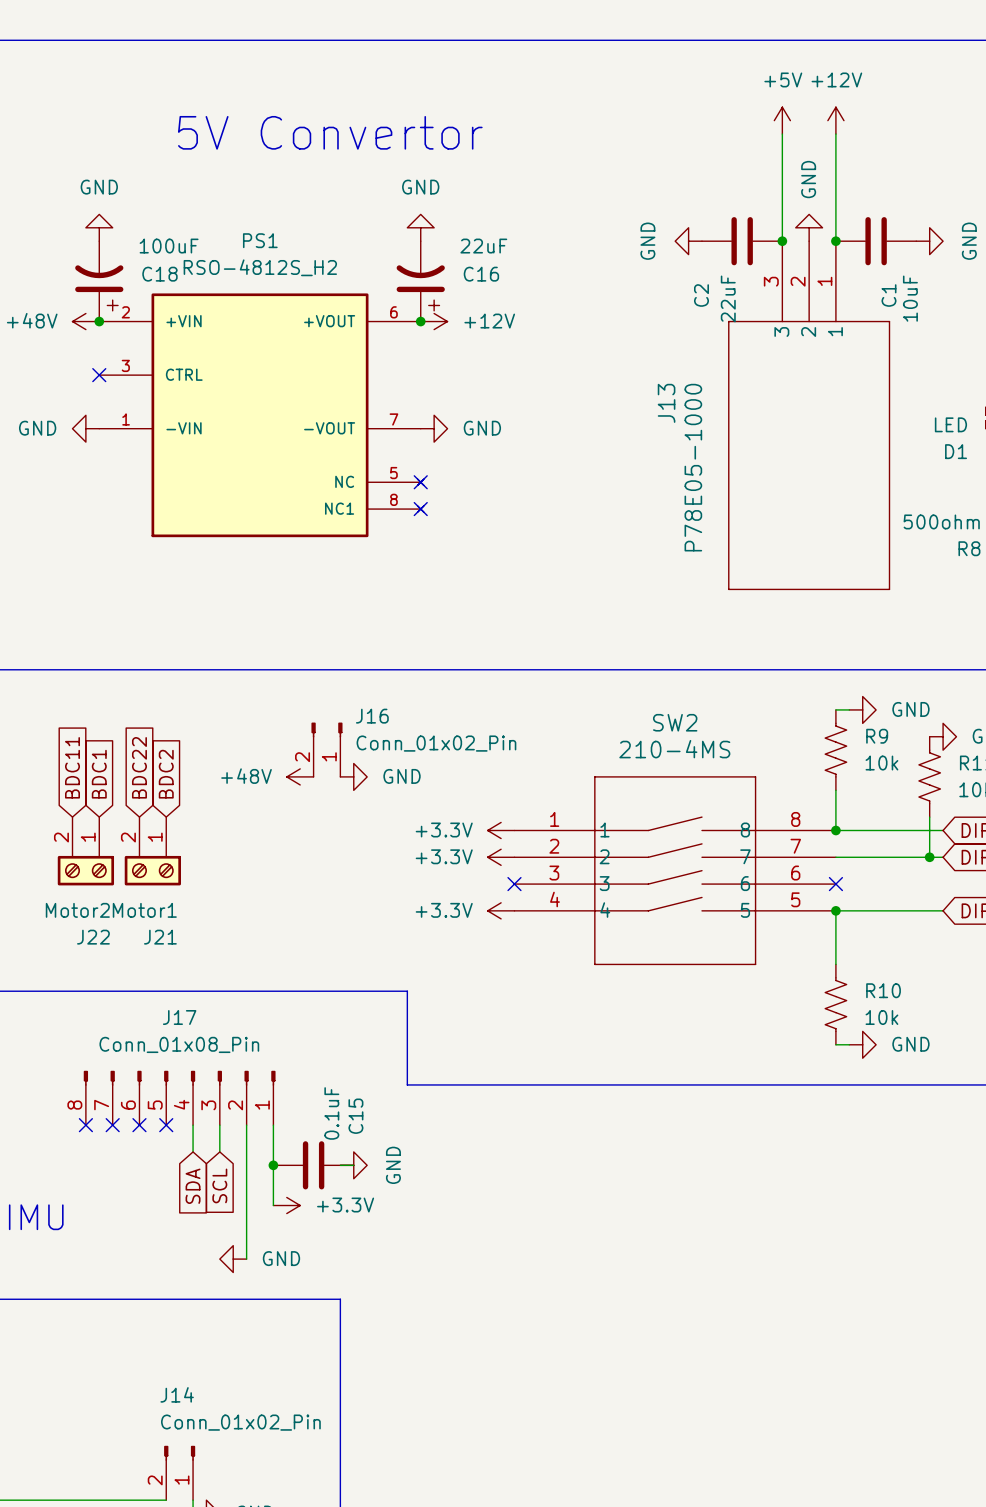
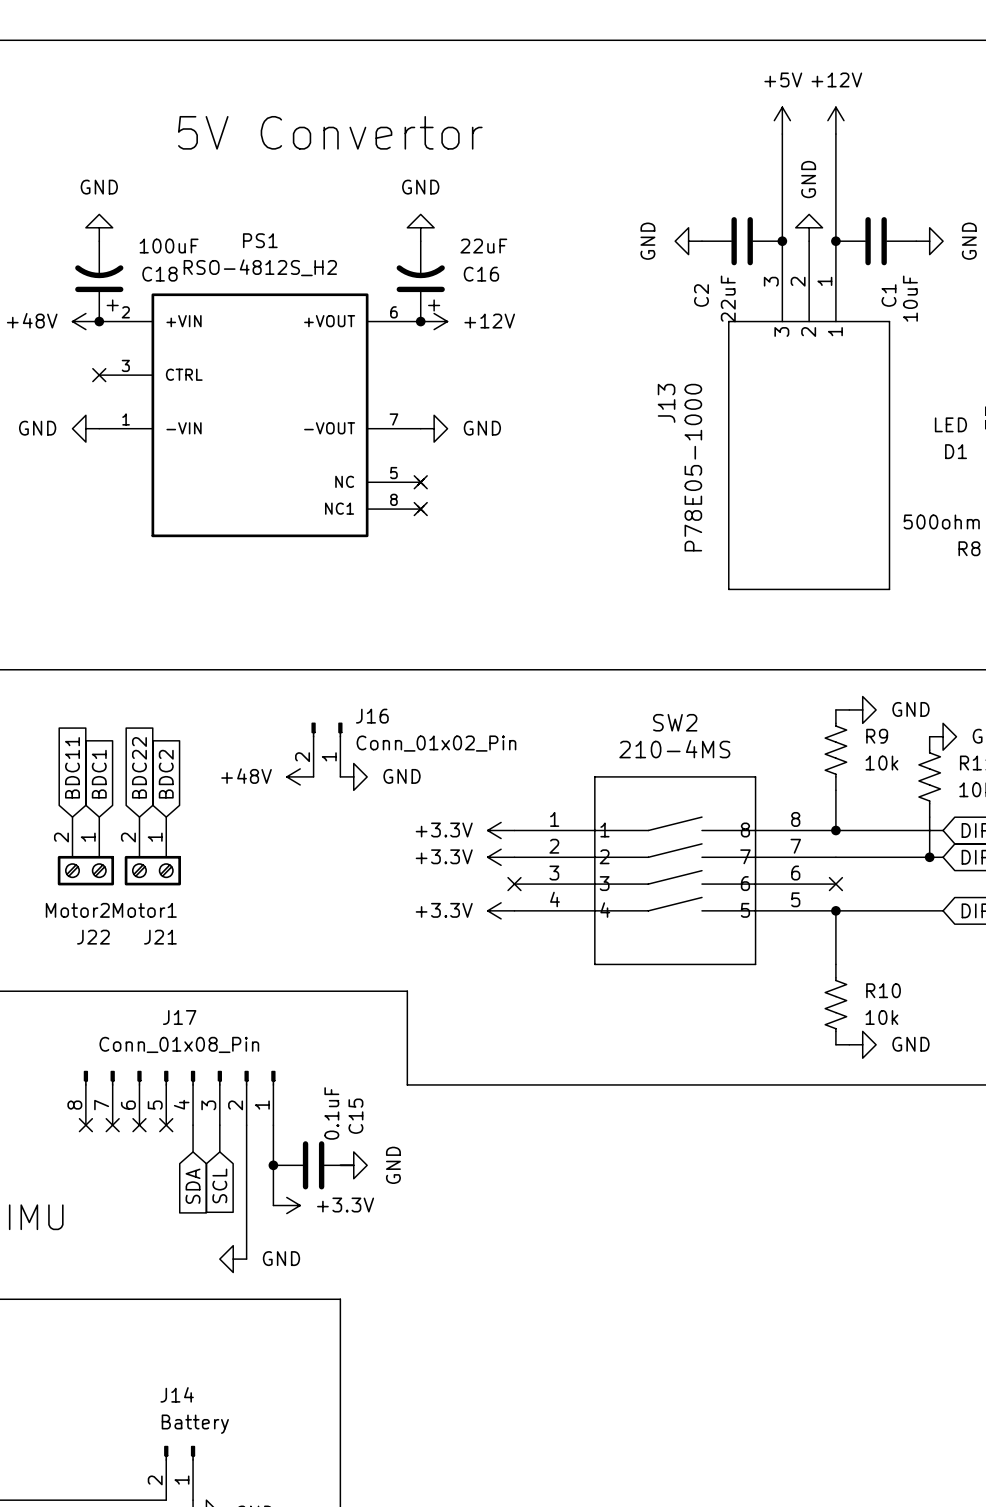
J14 value: Conn_01x02_Pin (240, 1422) -> Battery (195, 1424)

